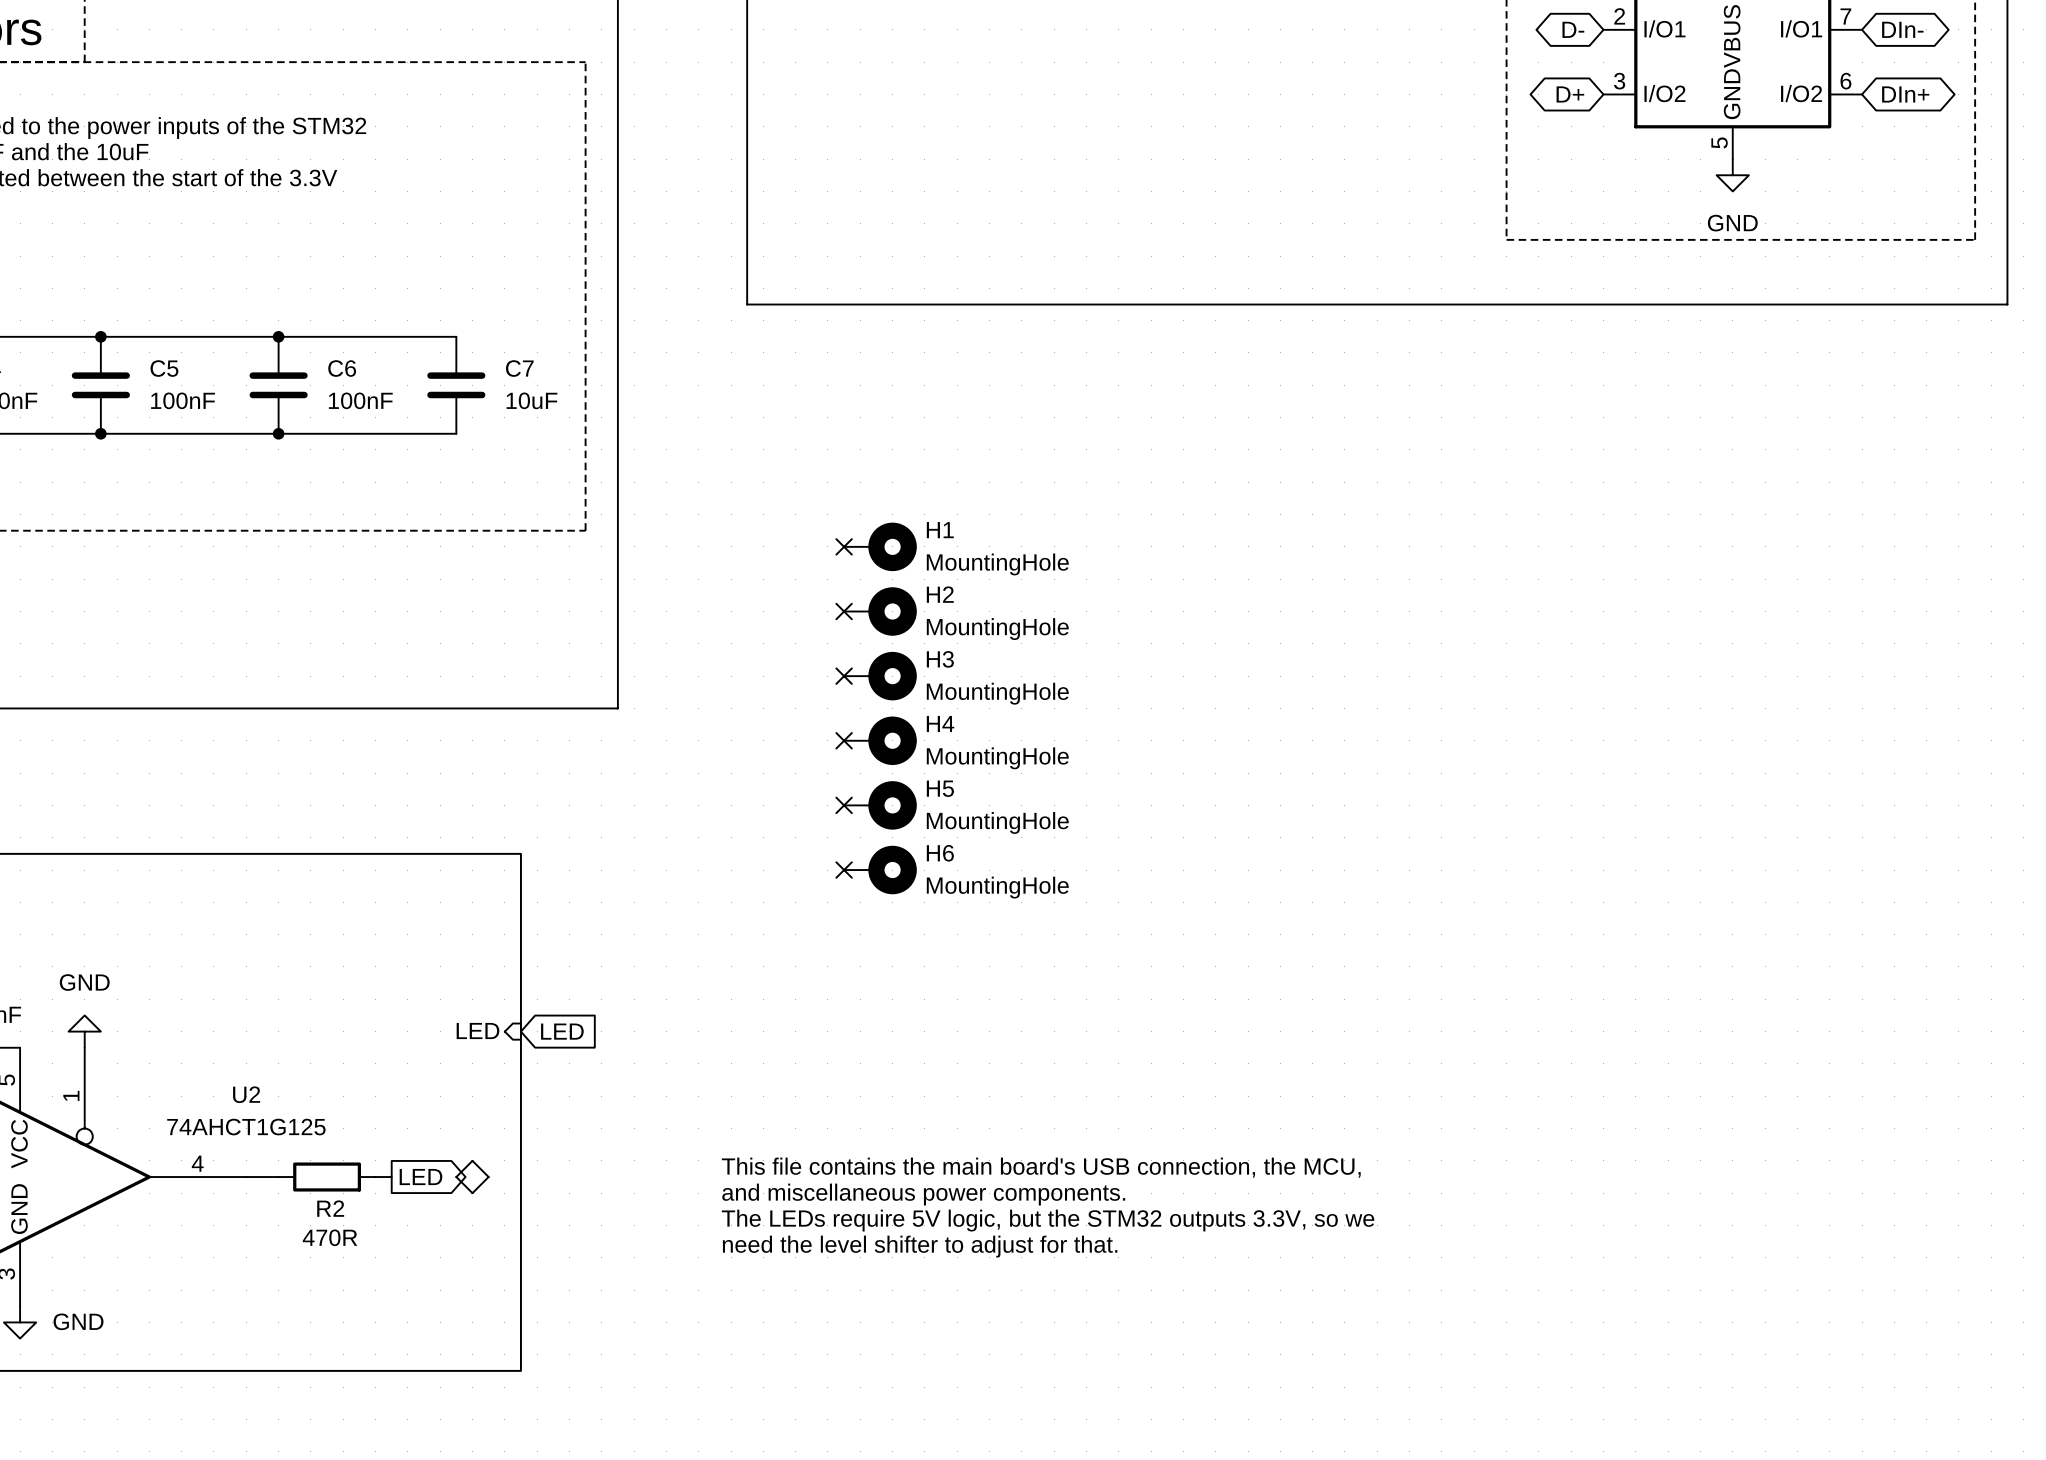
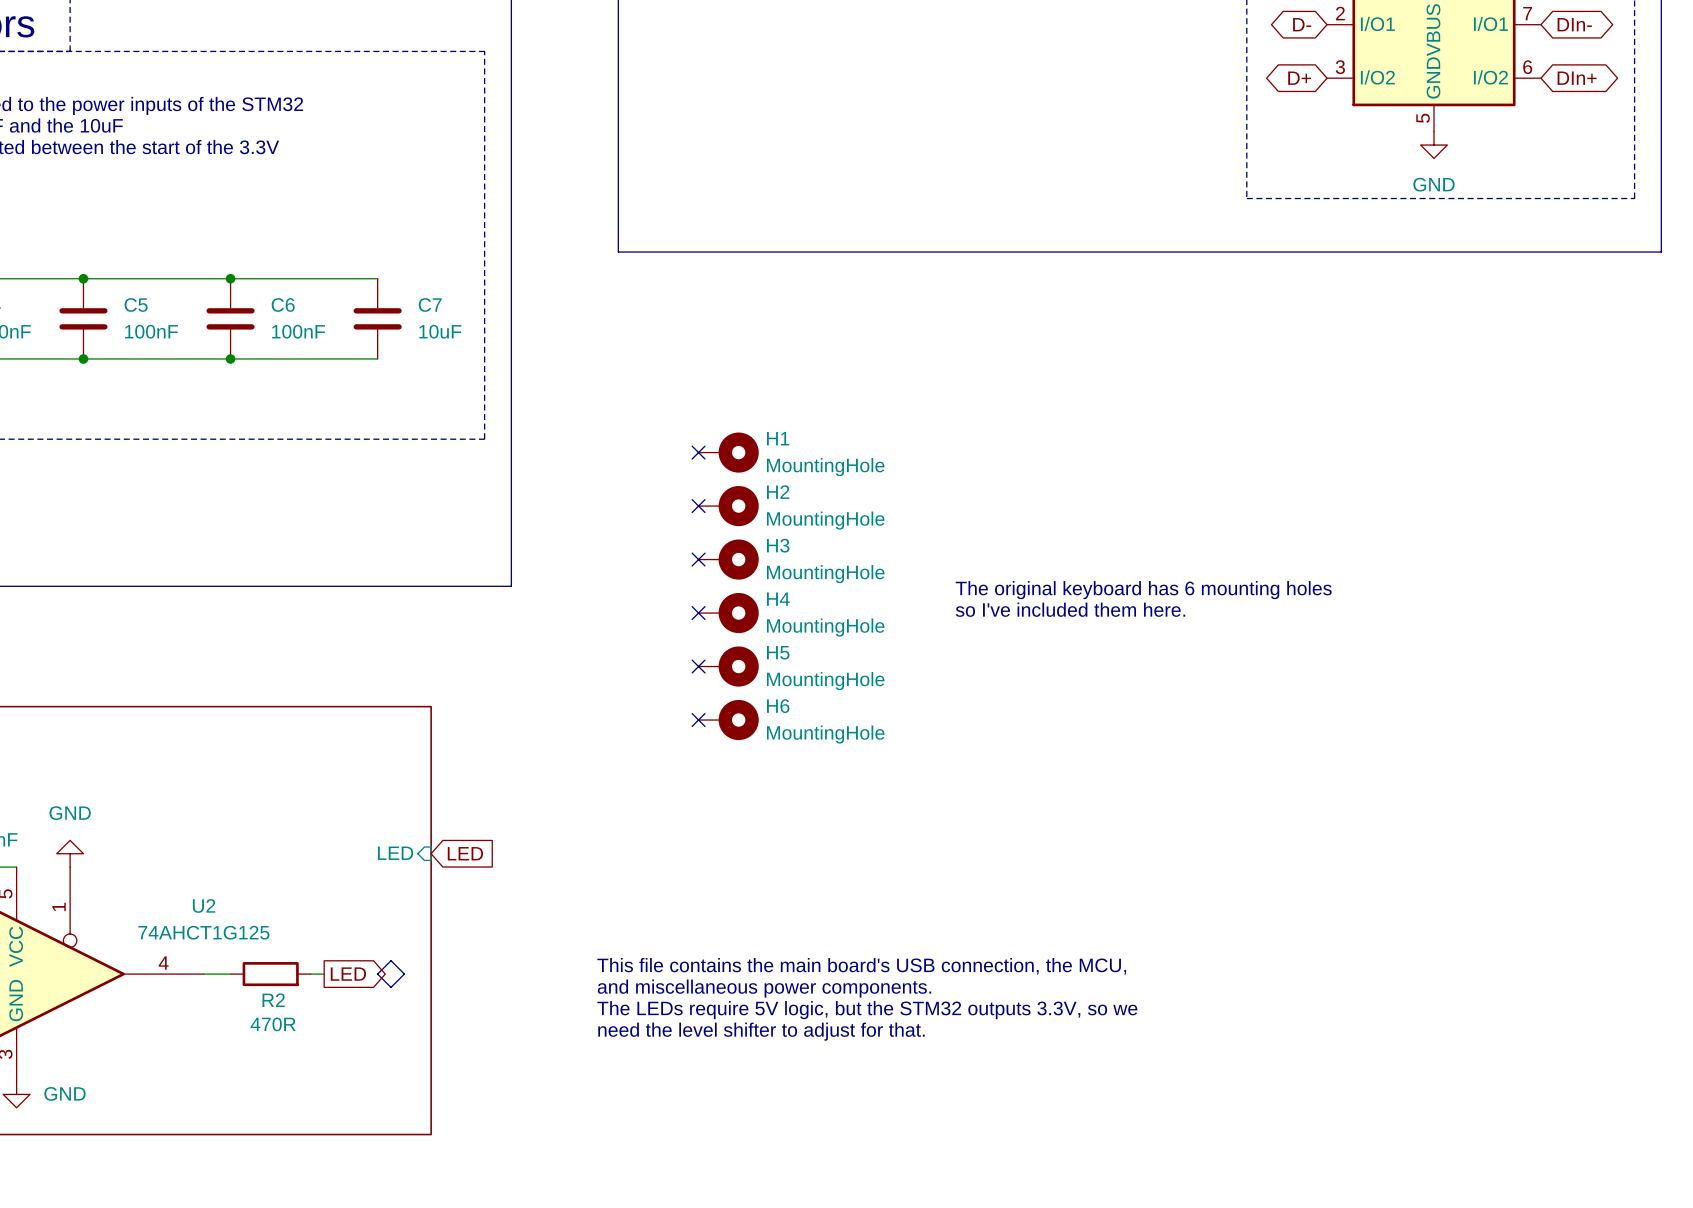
text: none -> The original keyboard has 6 mounting holes (1143, 590)
text: none -> so I've included them here. (1070, 609)

